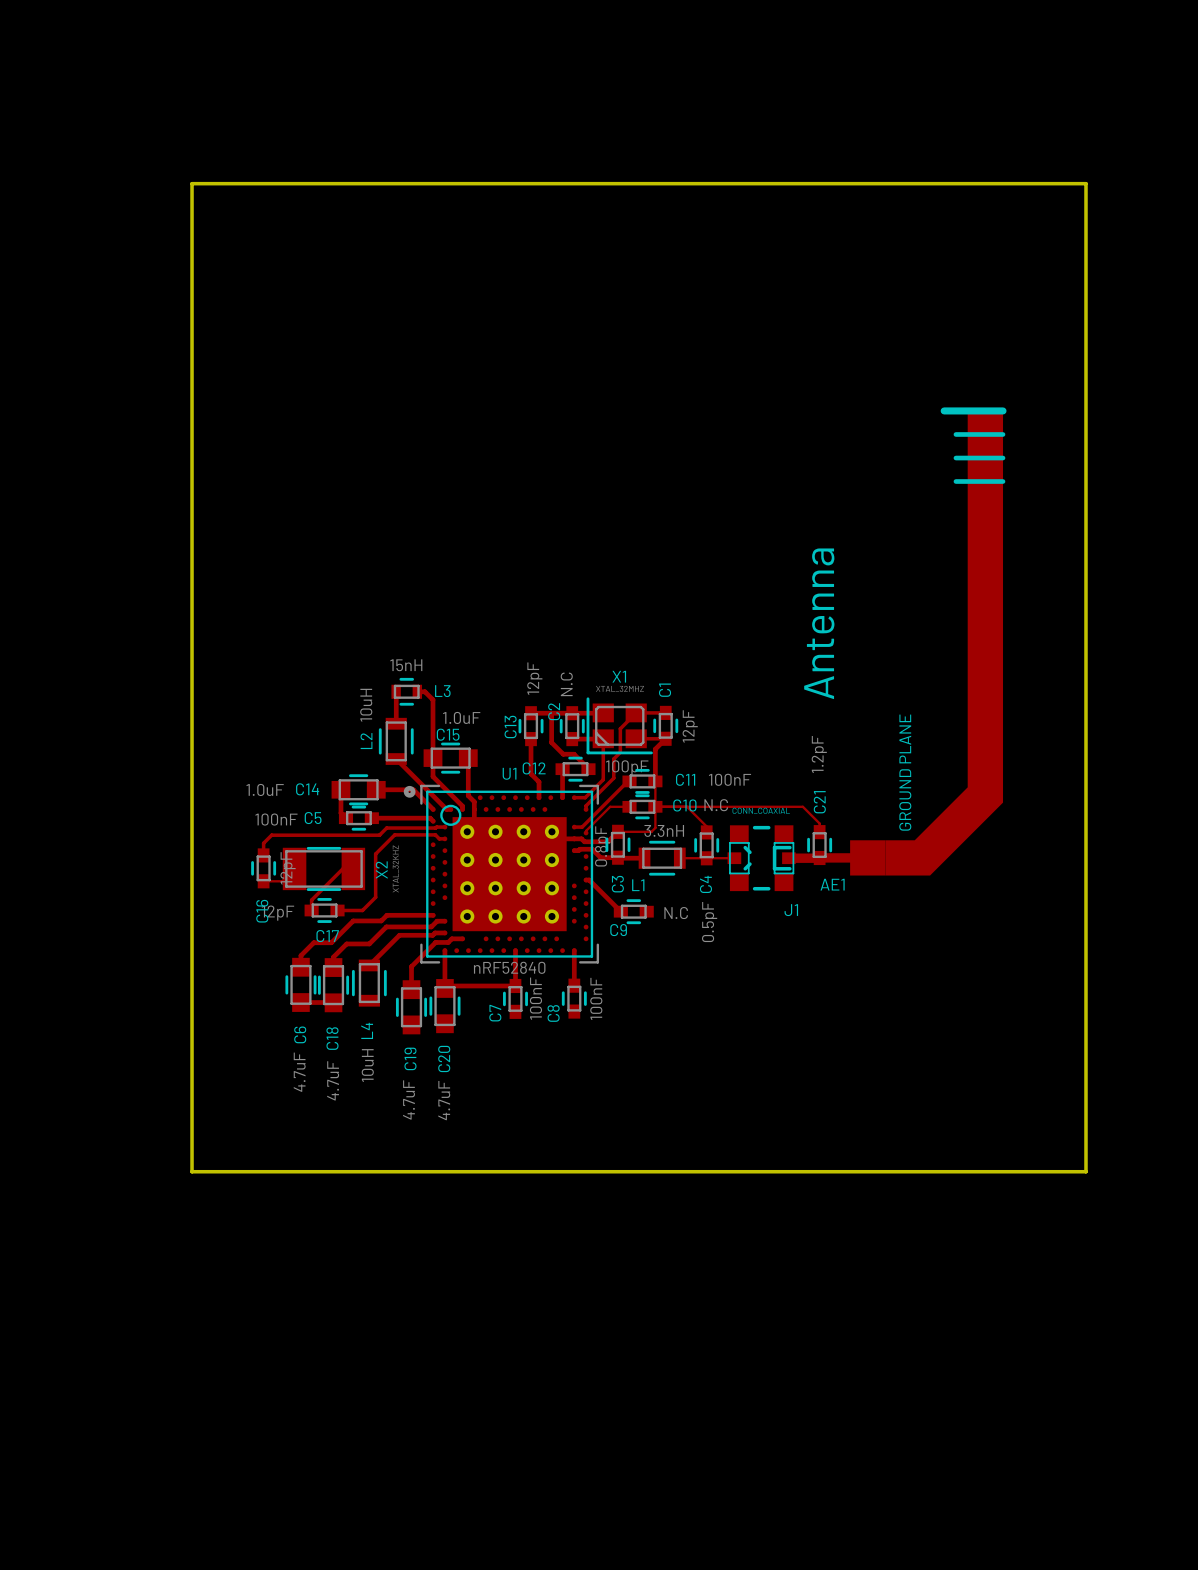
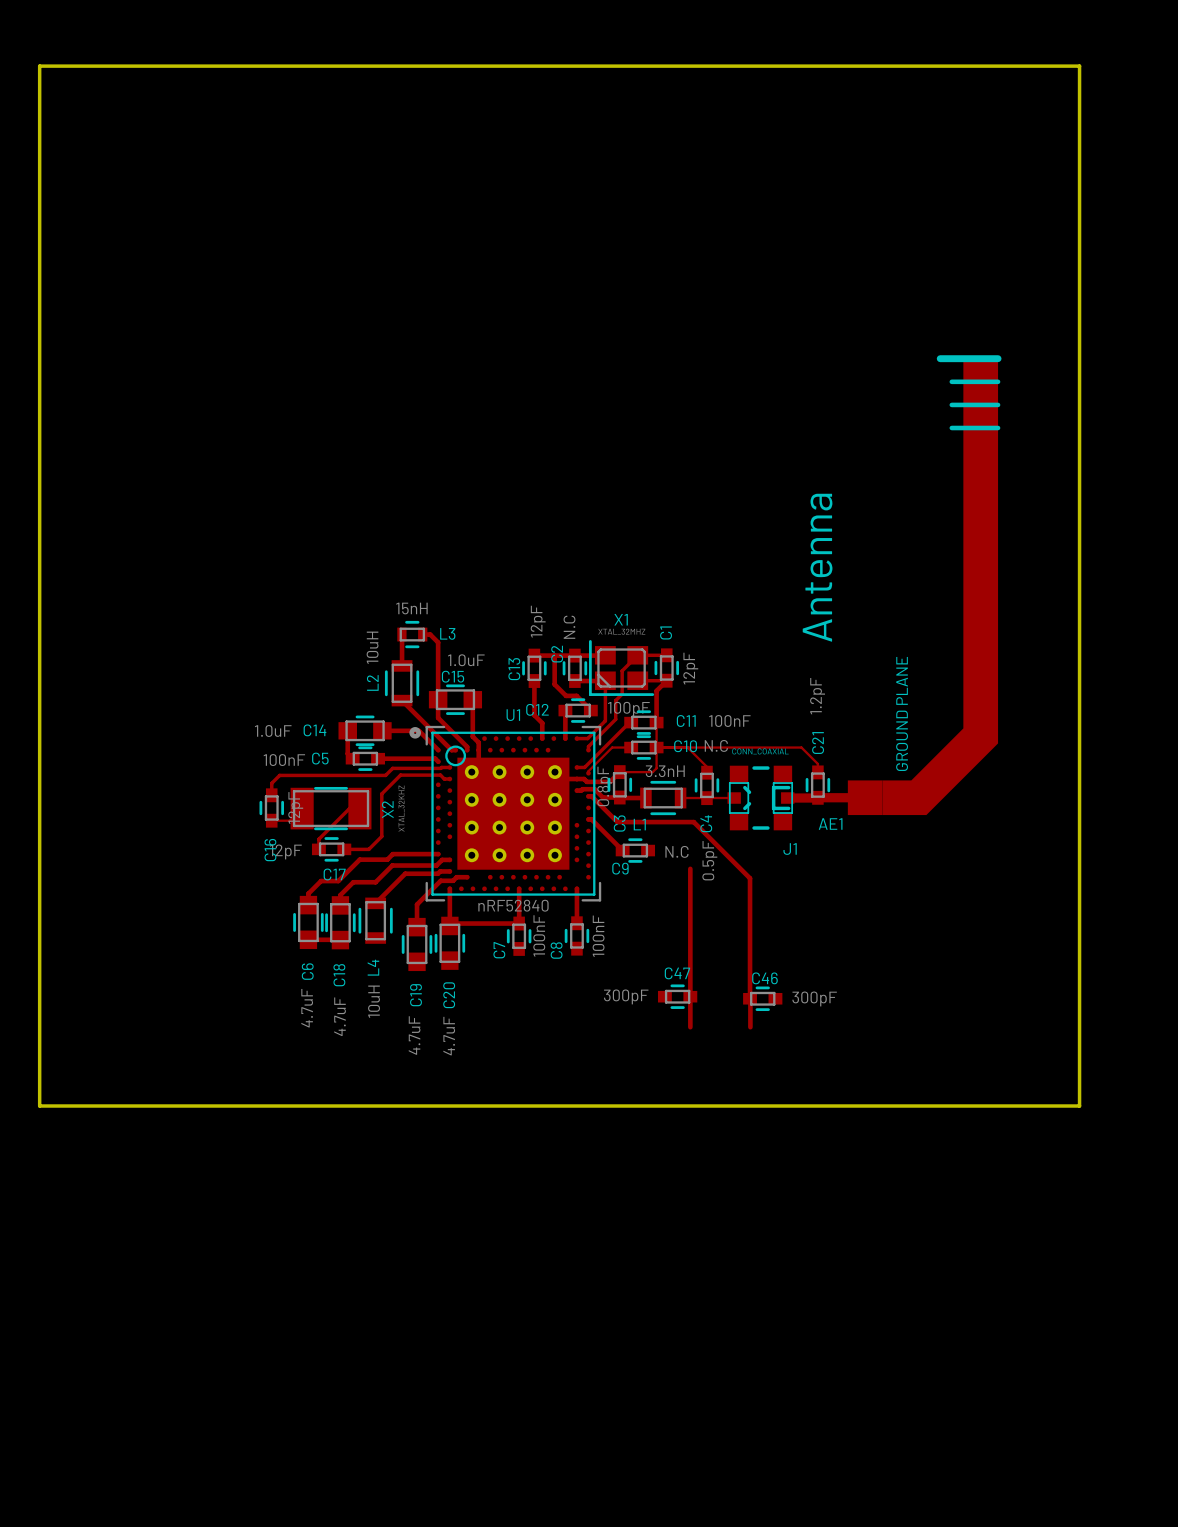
board edge: (1085, 183) (192, 183) (192, 1171) -> (1079, 135) (1079, 66) (39, 66) (39, 1106) (201, 1106)
top track: none -> (588, 796) (591, 796) (617, 822) (693, 822) (750, 878) (750, 1027)
top track: none -> (690, 868) (690, 1027)
C47: none -> 300pF (677, 996)
C46: none -> 300pF (762, 998)

